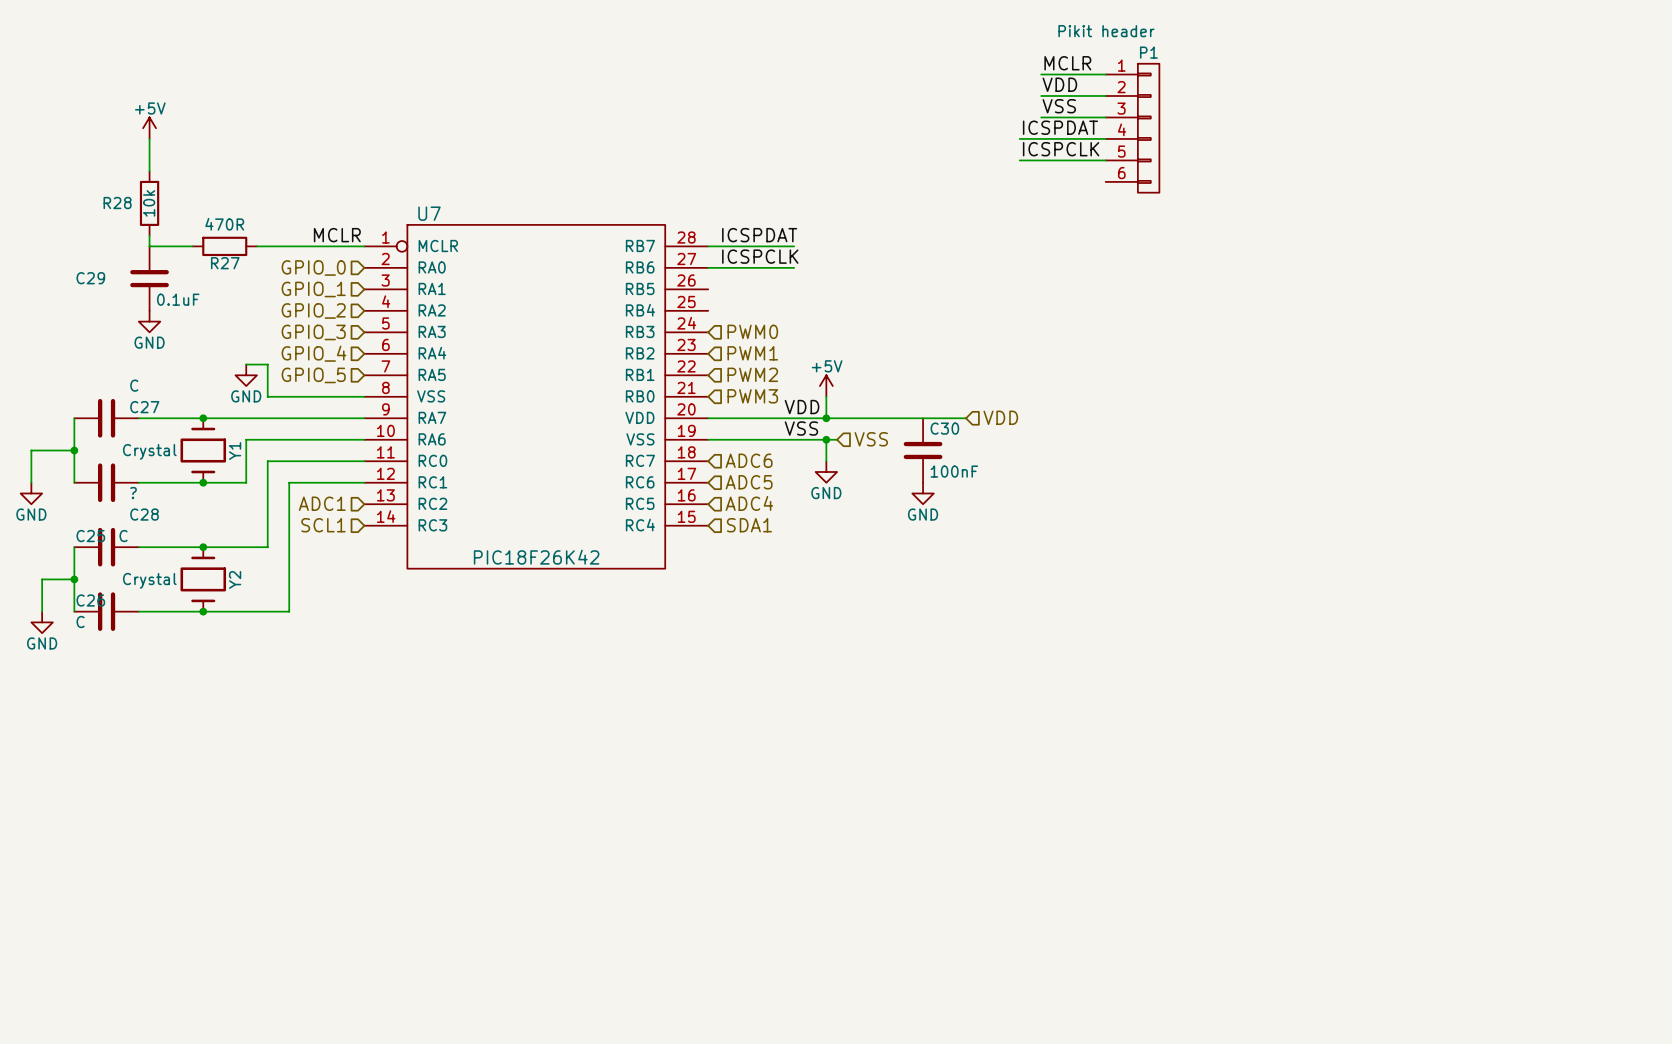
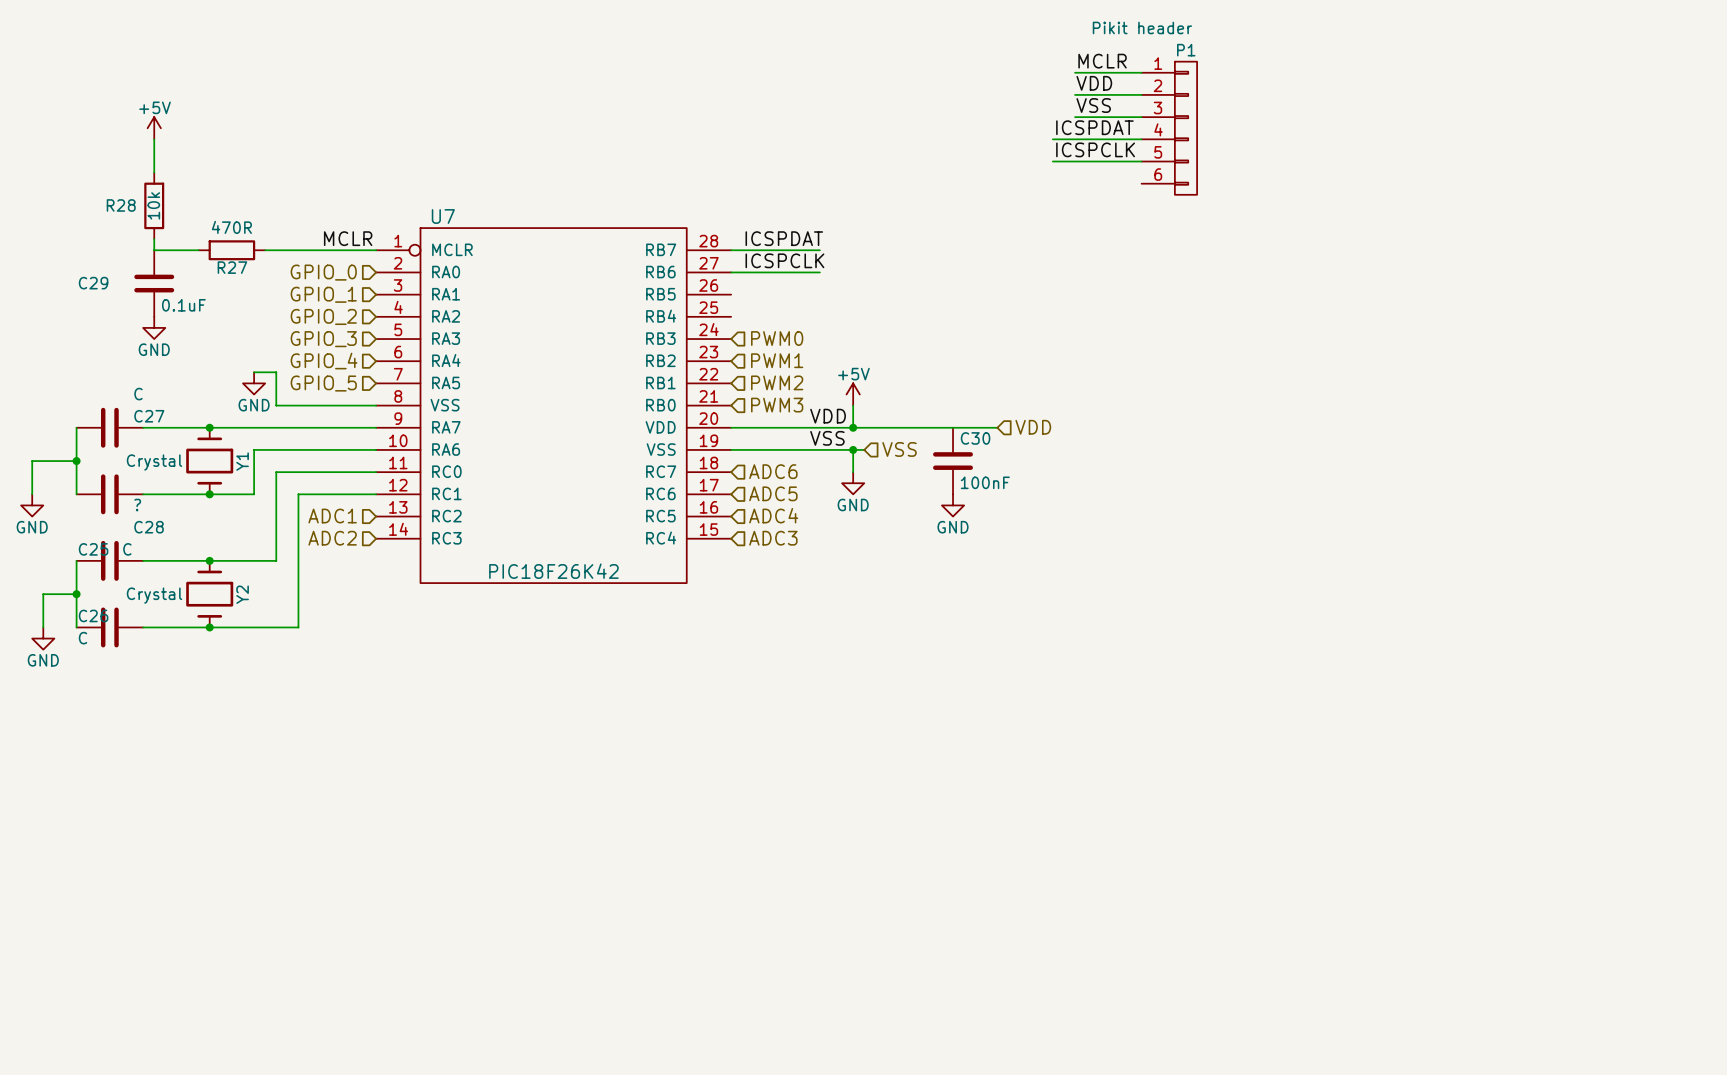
hierarchical label: SCL1 (323, 525) -> ADC2 (332, 538)
hierarchical label: SDA1 (749, 525) -> ADC3 (773, 538)

